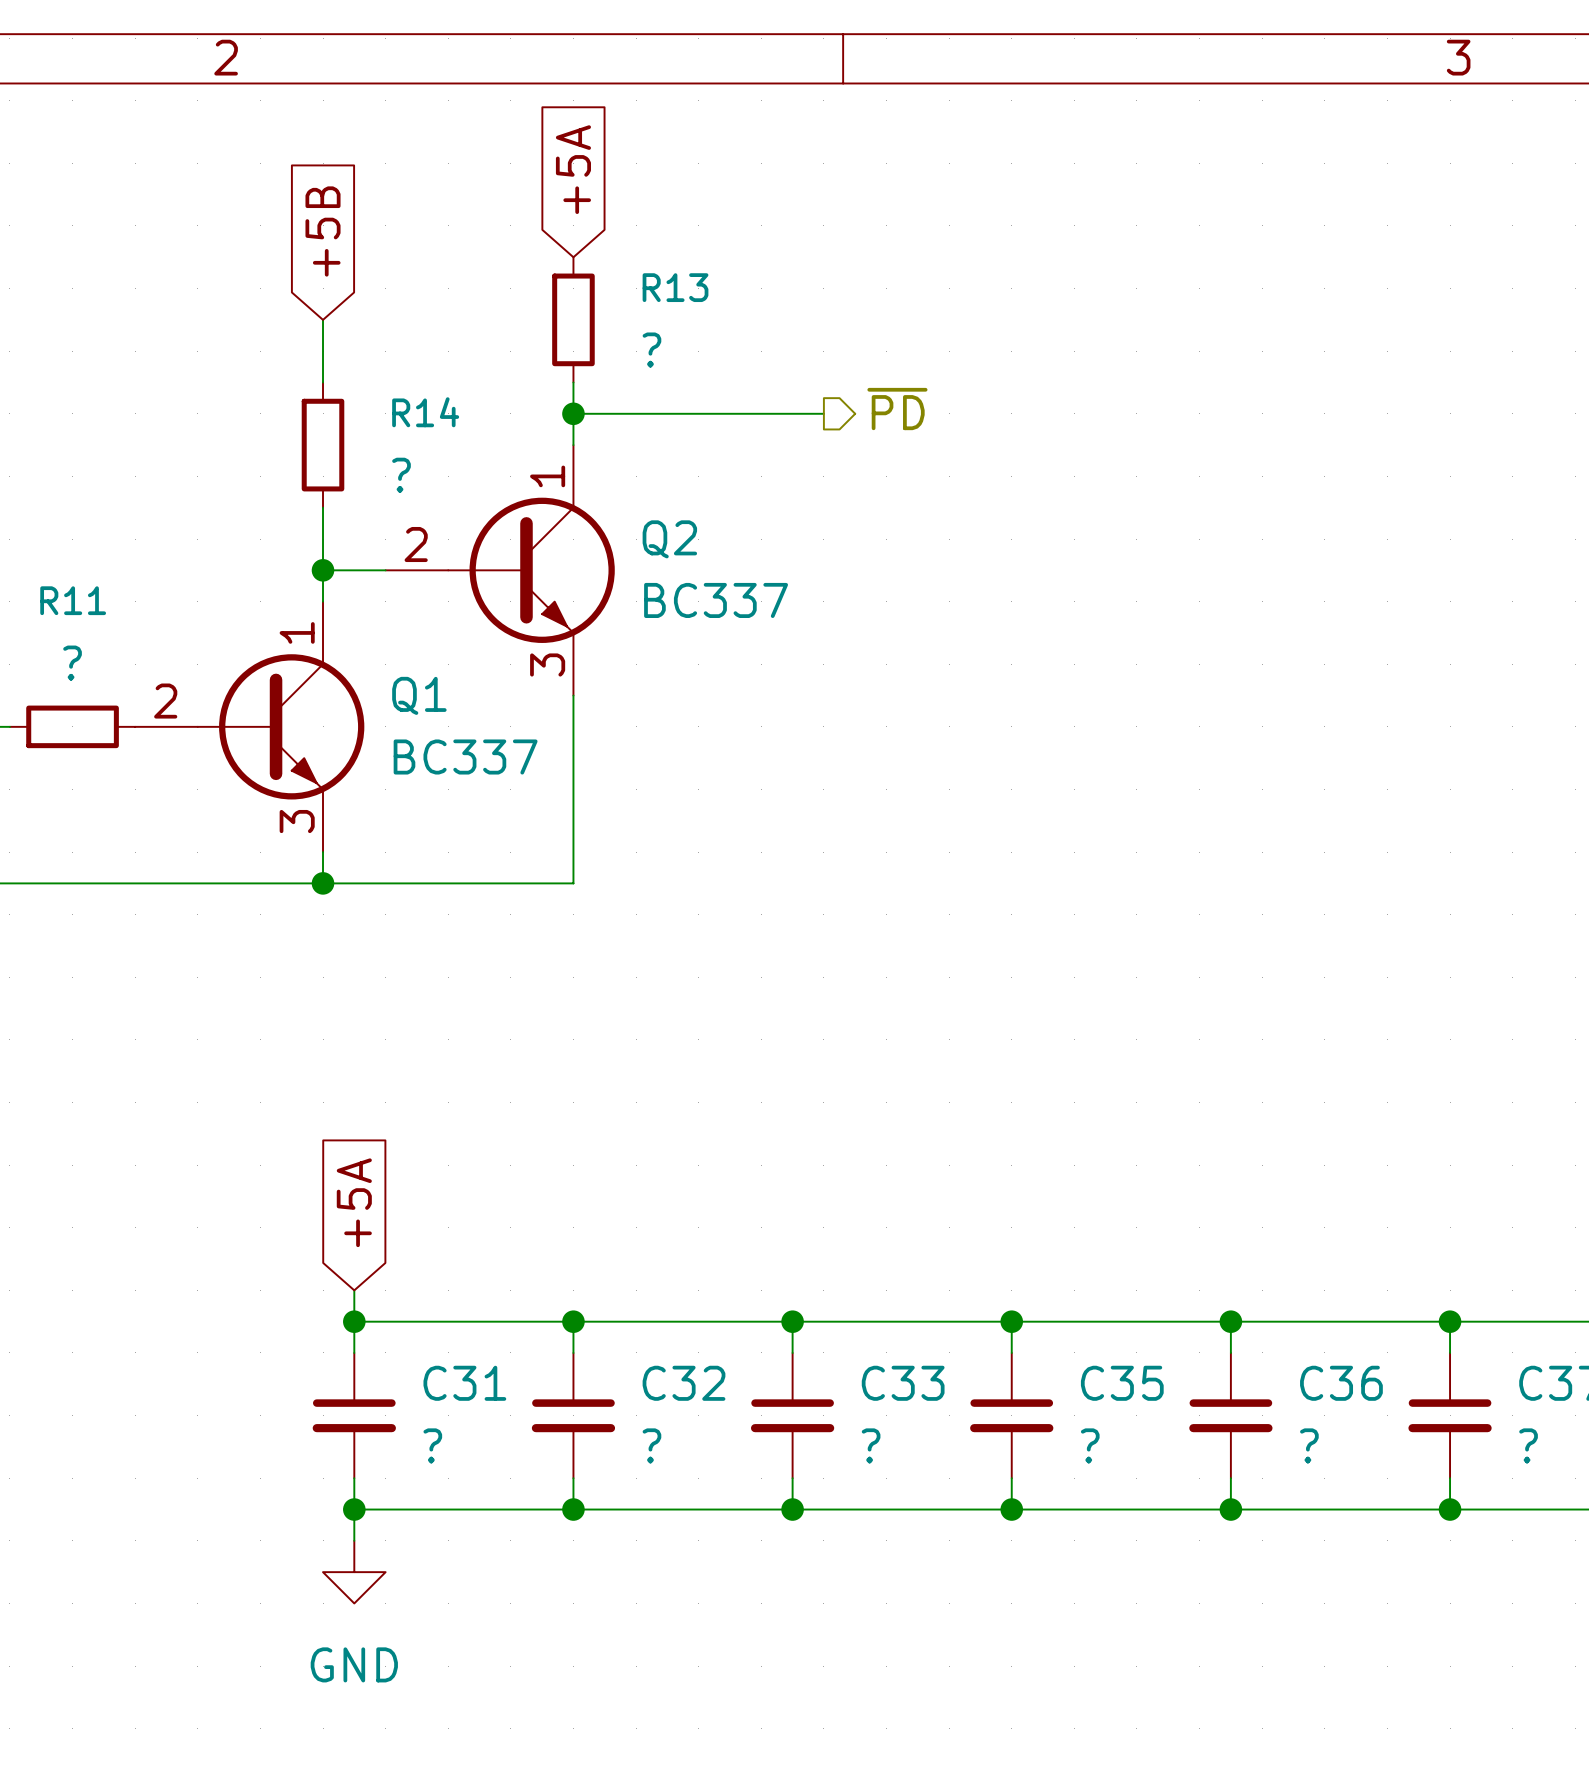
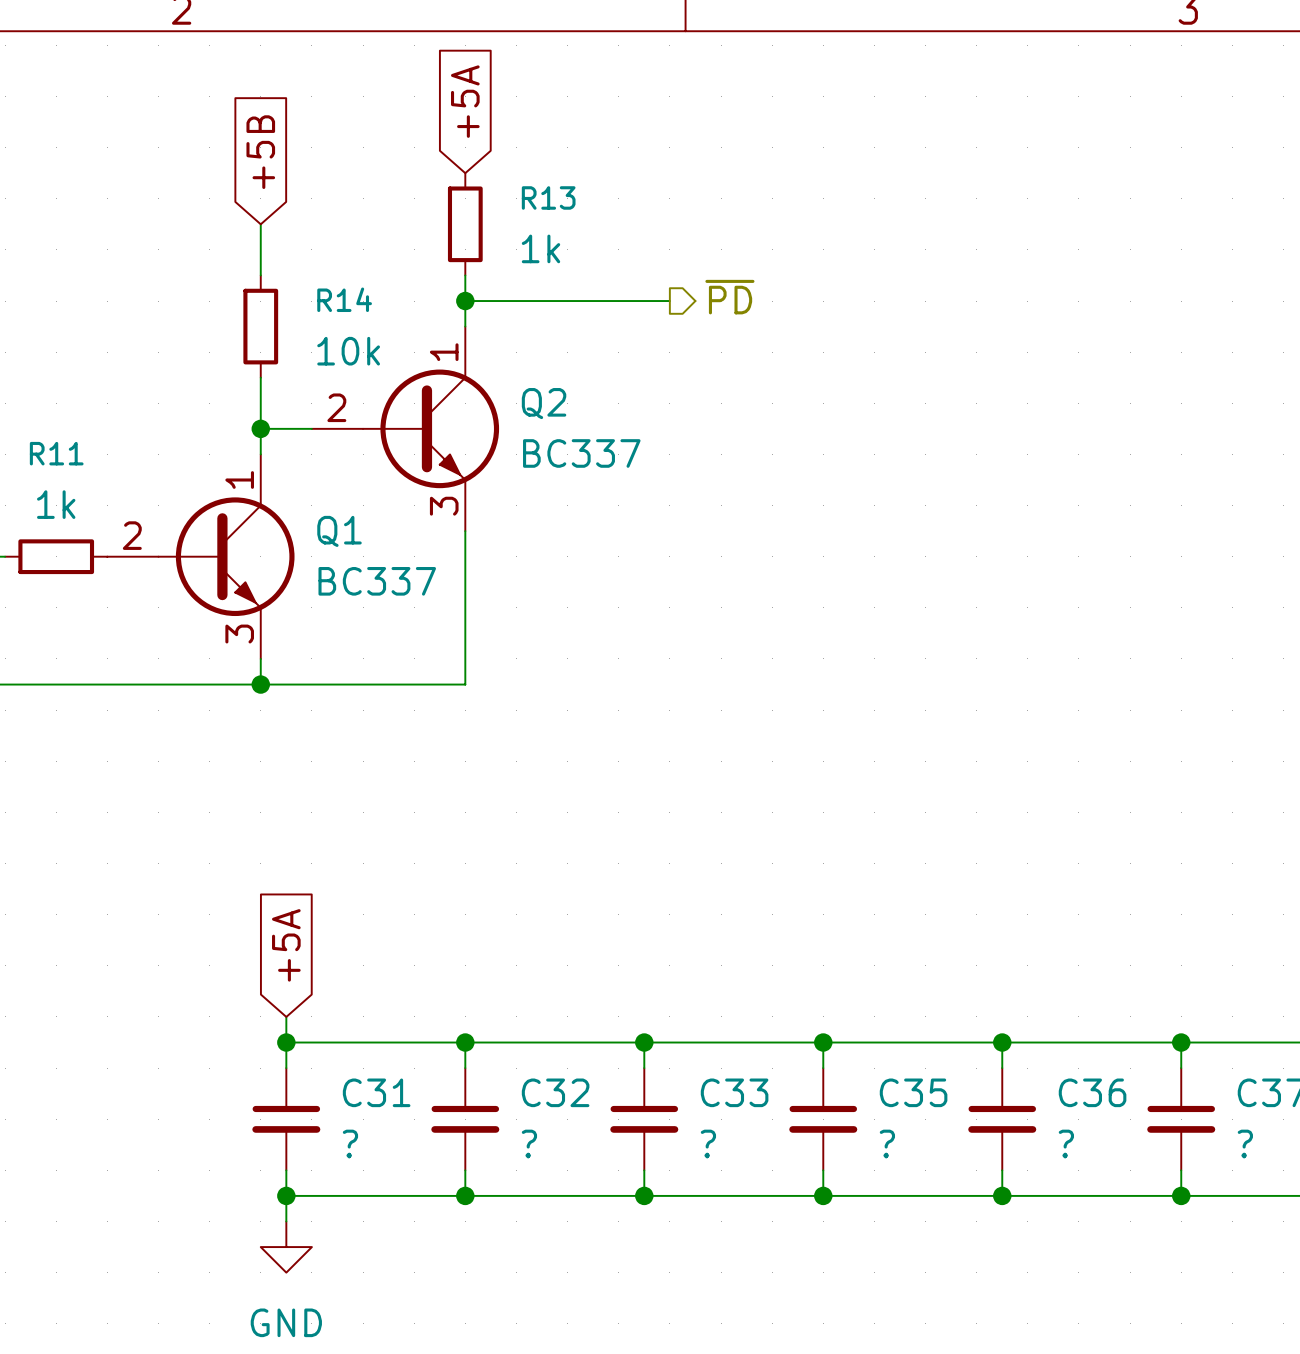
R13 value: ? (651, 350) -> 1k (541, 248)
R14 value: ? (401, 475) -> 10k (348, 351)
R11 value: ? (72, 663) -> 1k (56, 504)

